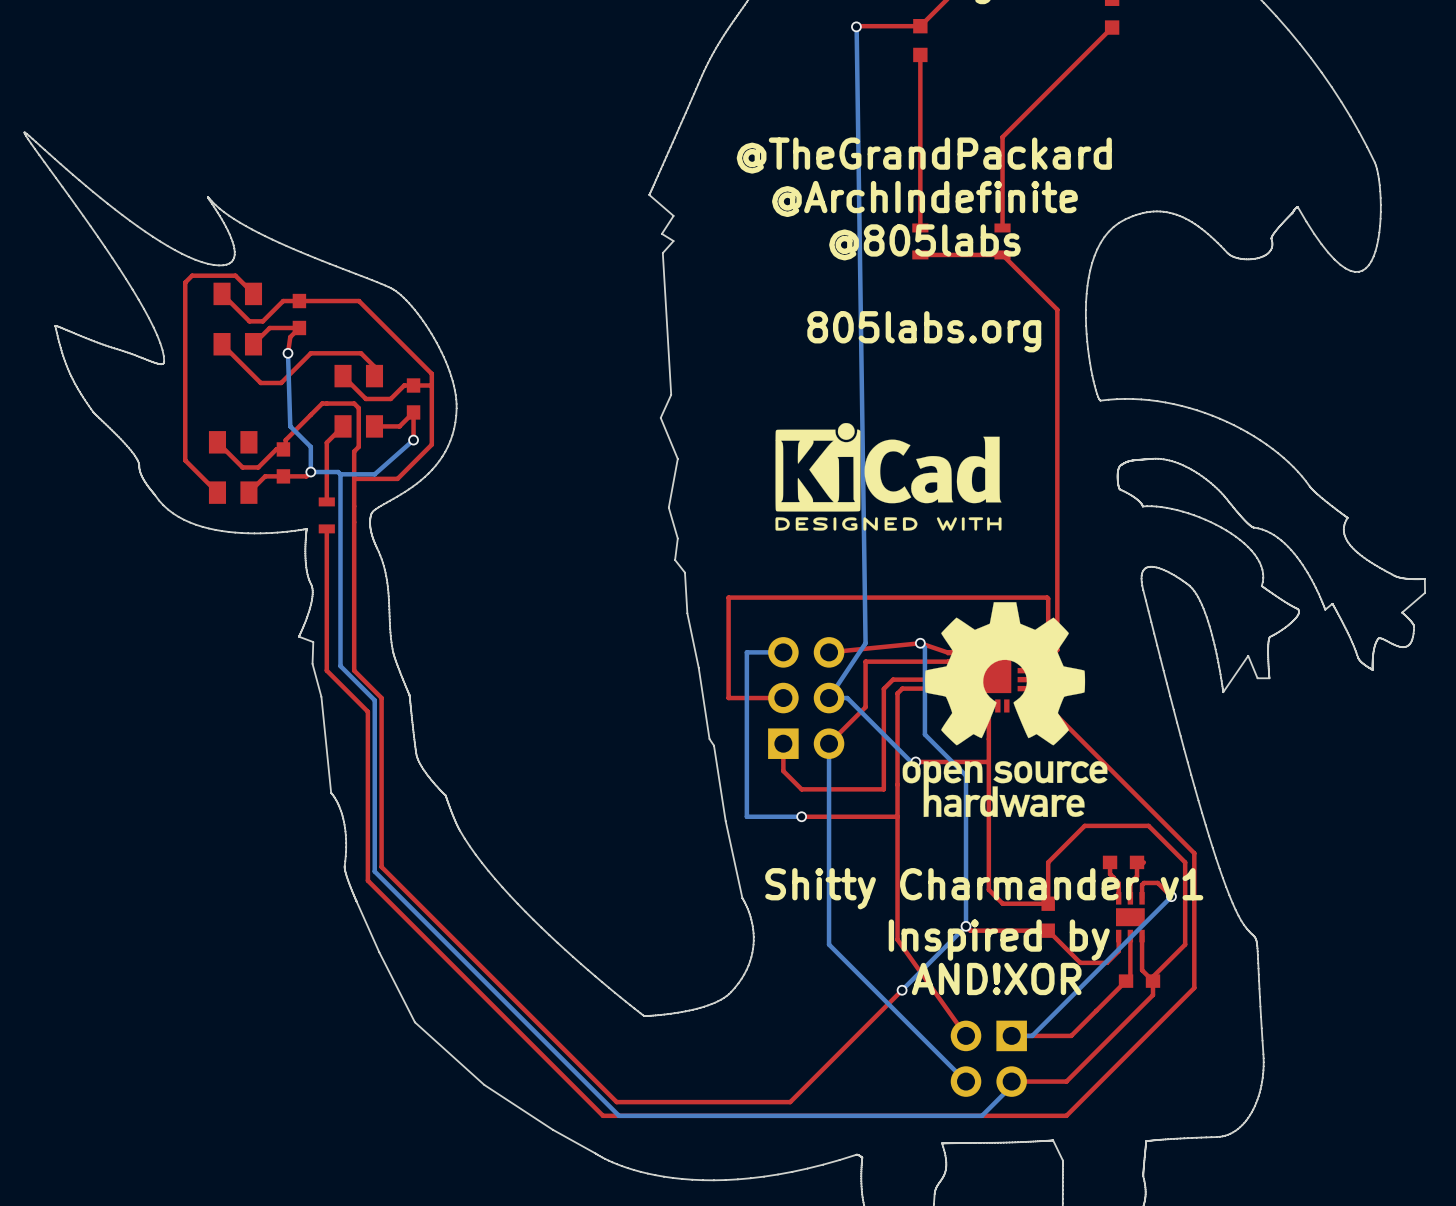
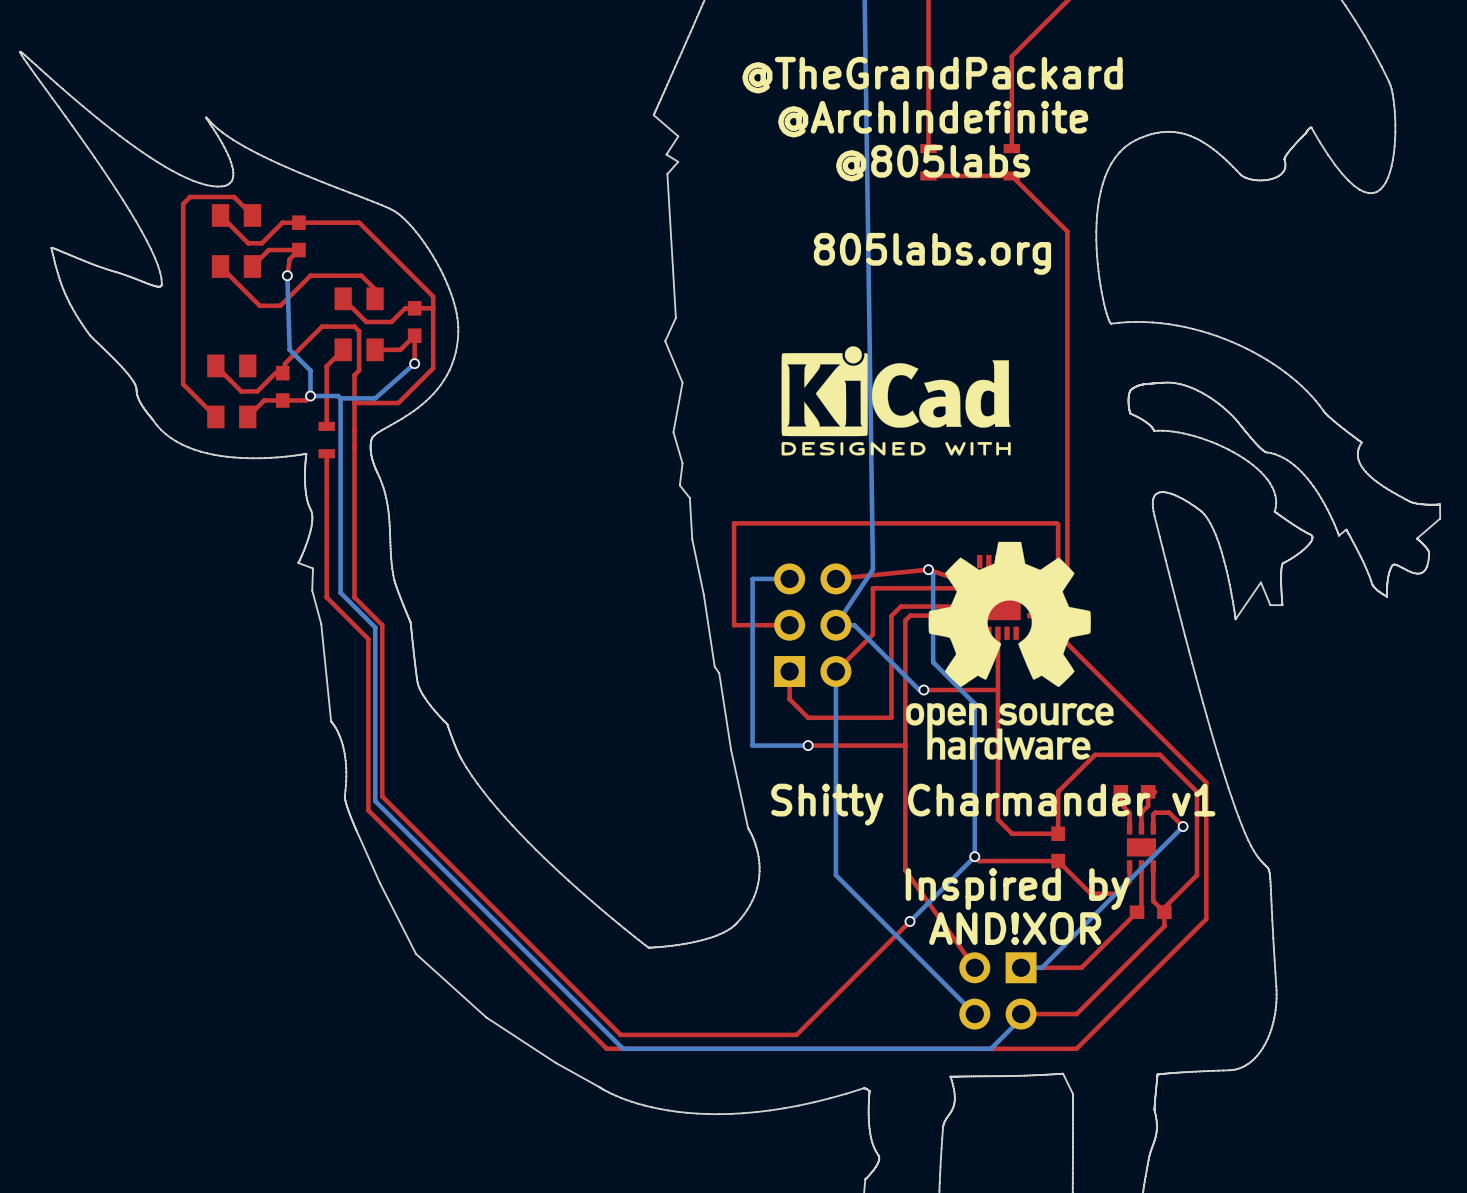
drawing position: (1005, 709) -> (1009, 650)
text position: Shitty Charmander v1 (984, 888) -> Shitty Charmander v1 (993, 804)
text position: Inspired by (999, 940) -> Inspired by (1017, 889)
text position: AND!XOR (996, 978) -> AND!XOR (1015, 928)

